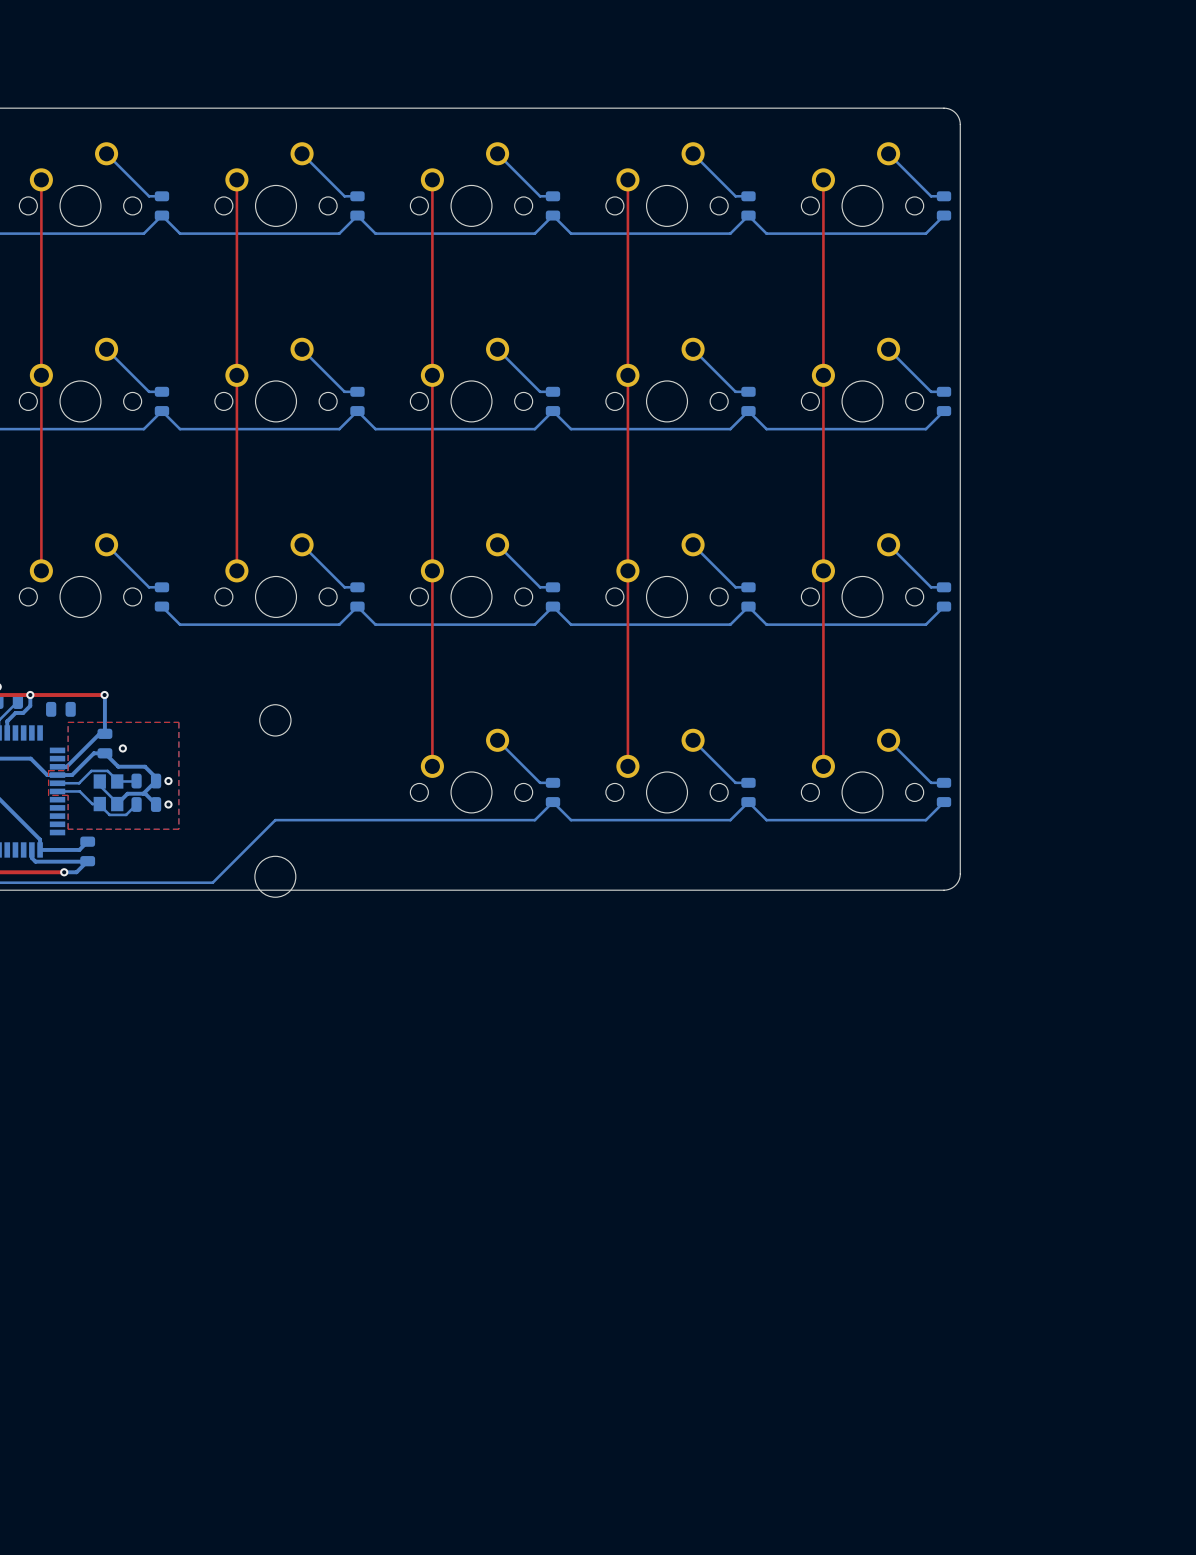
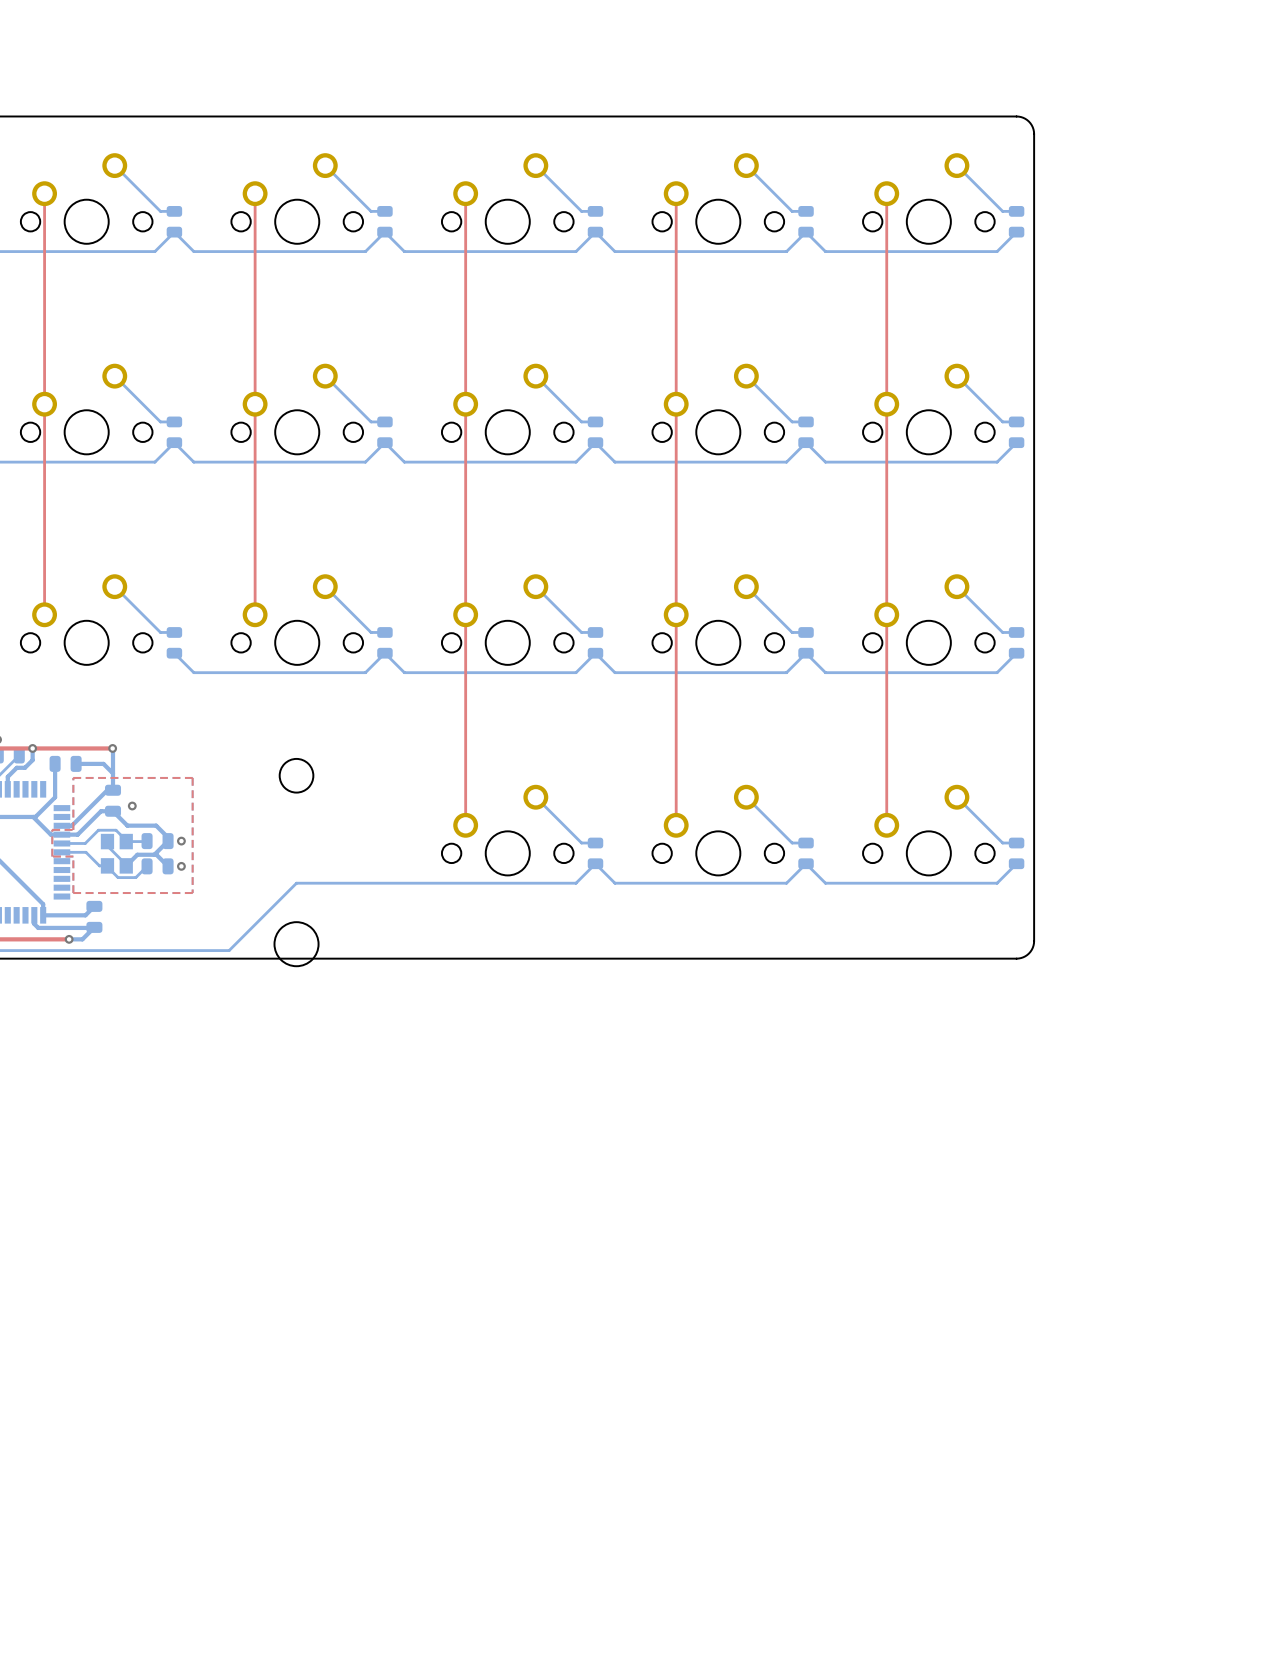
bottom track: none -> (55, 763) (55, 797) (35, 816) (33, 816)
bottom track: none -> (76, 763) (103, 763) (113, 773)

